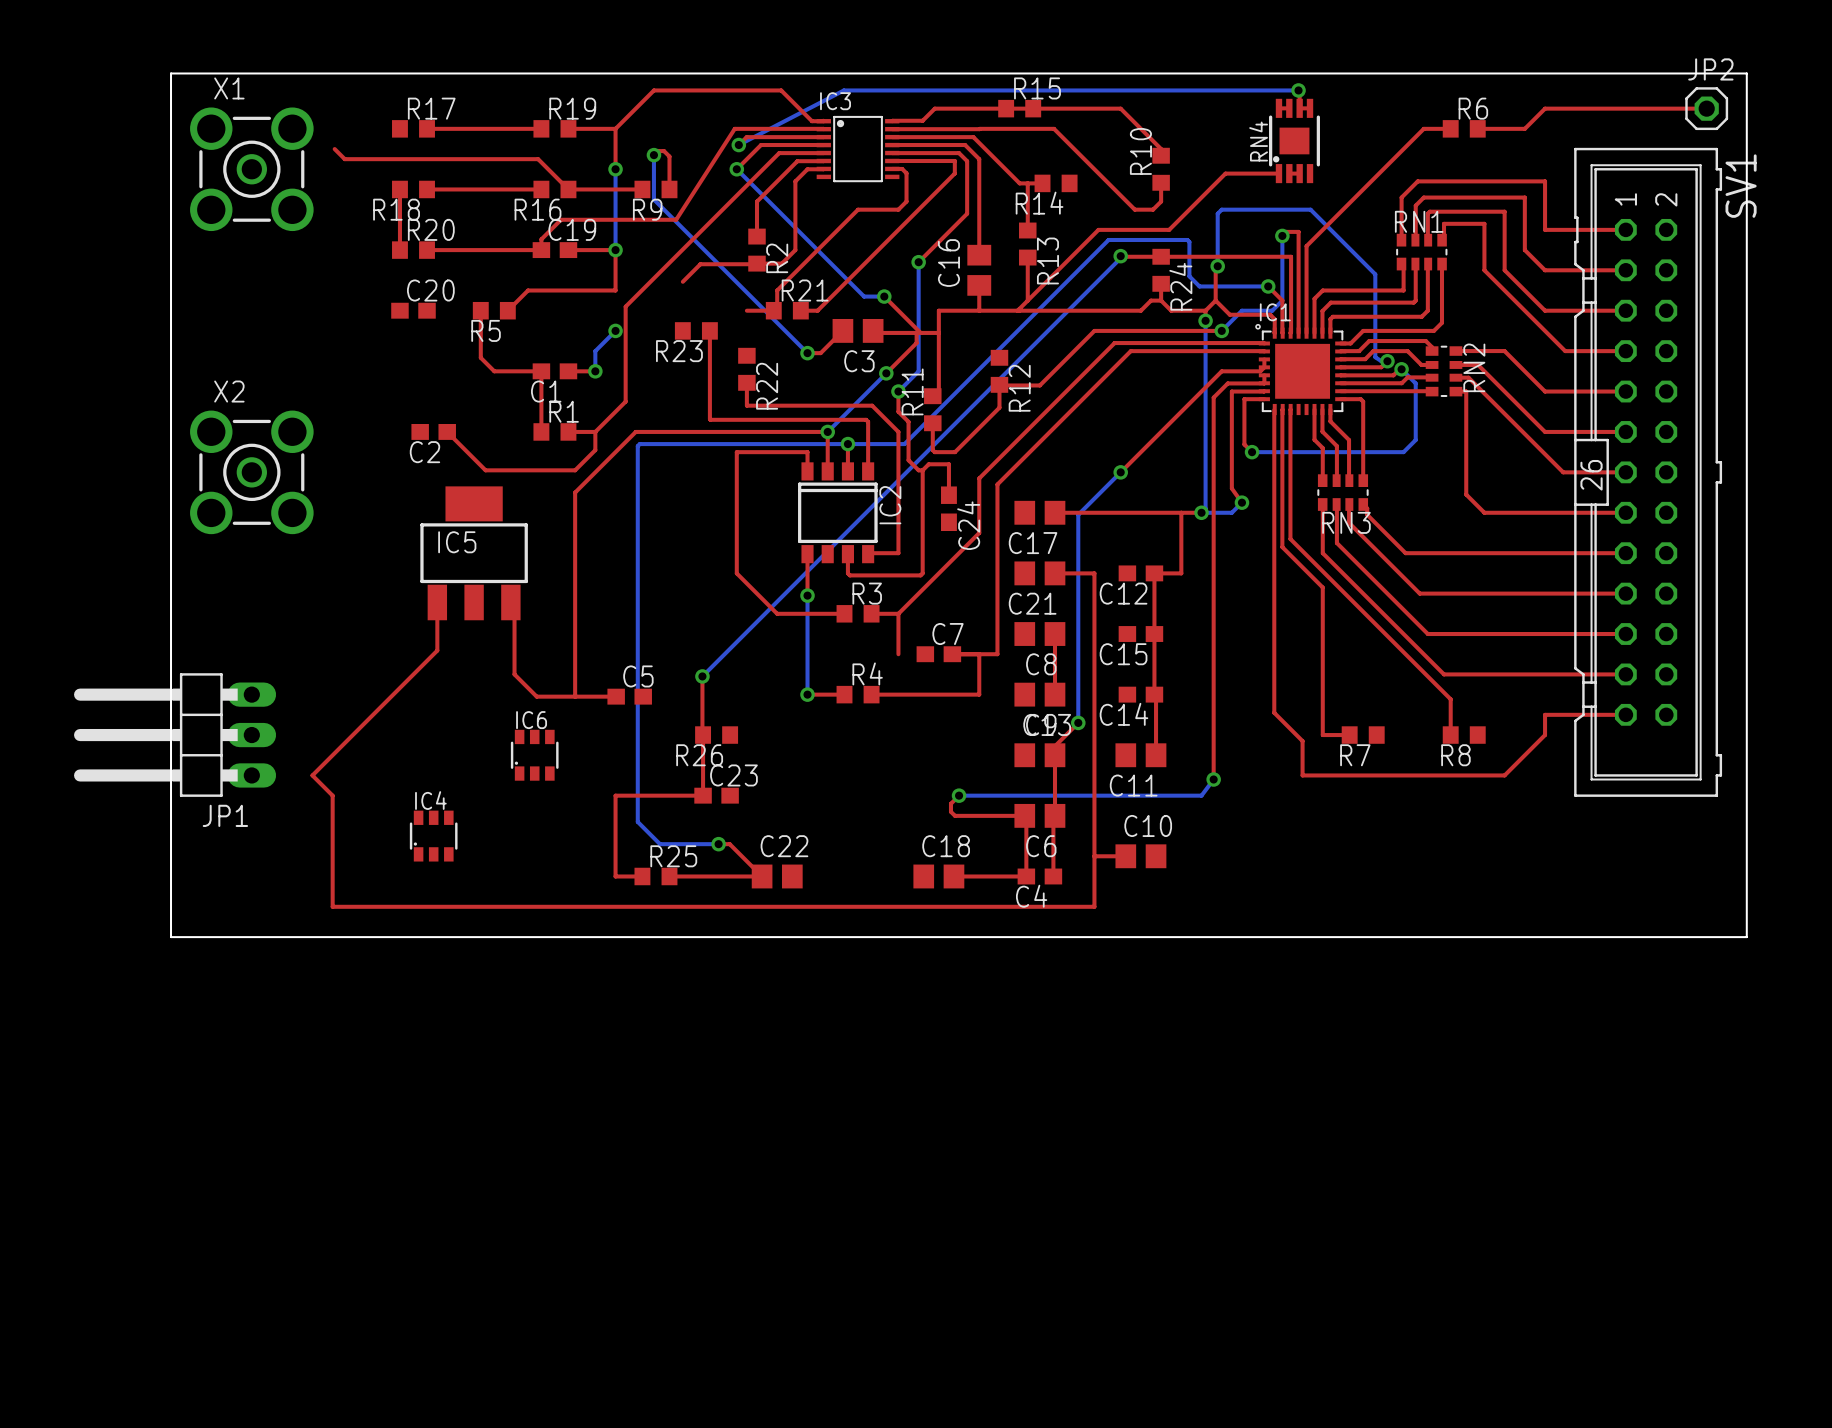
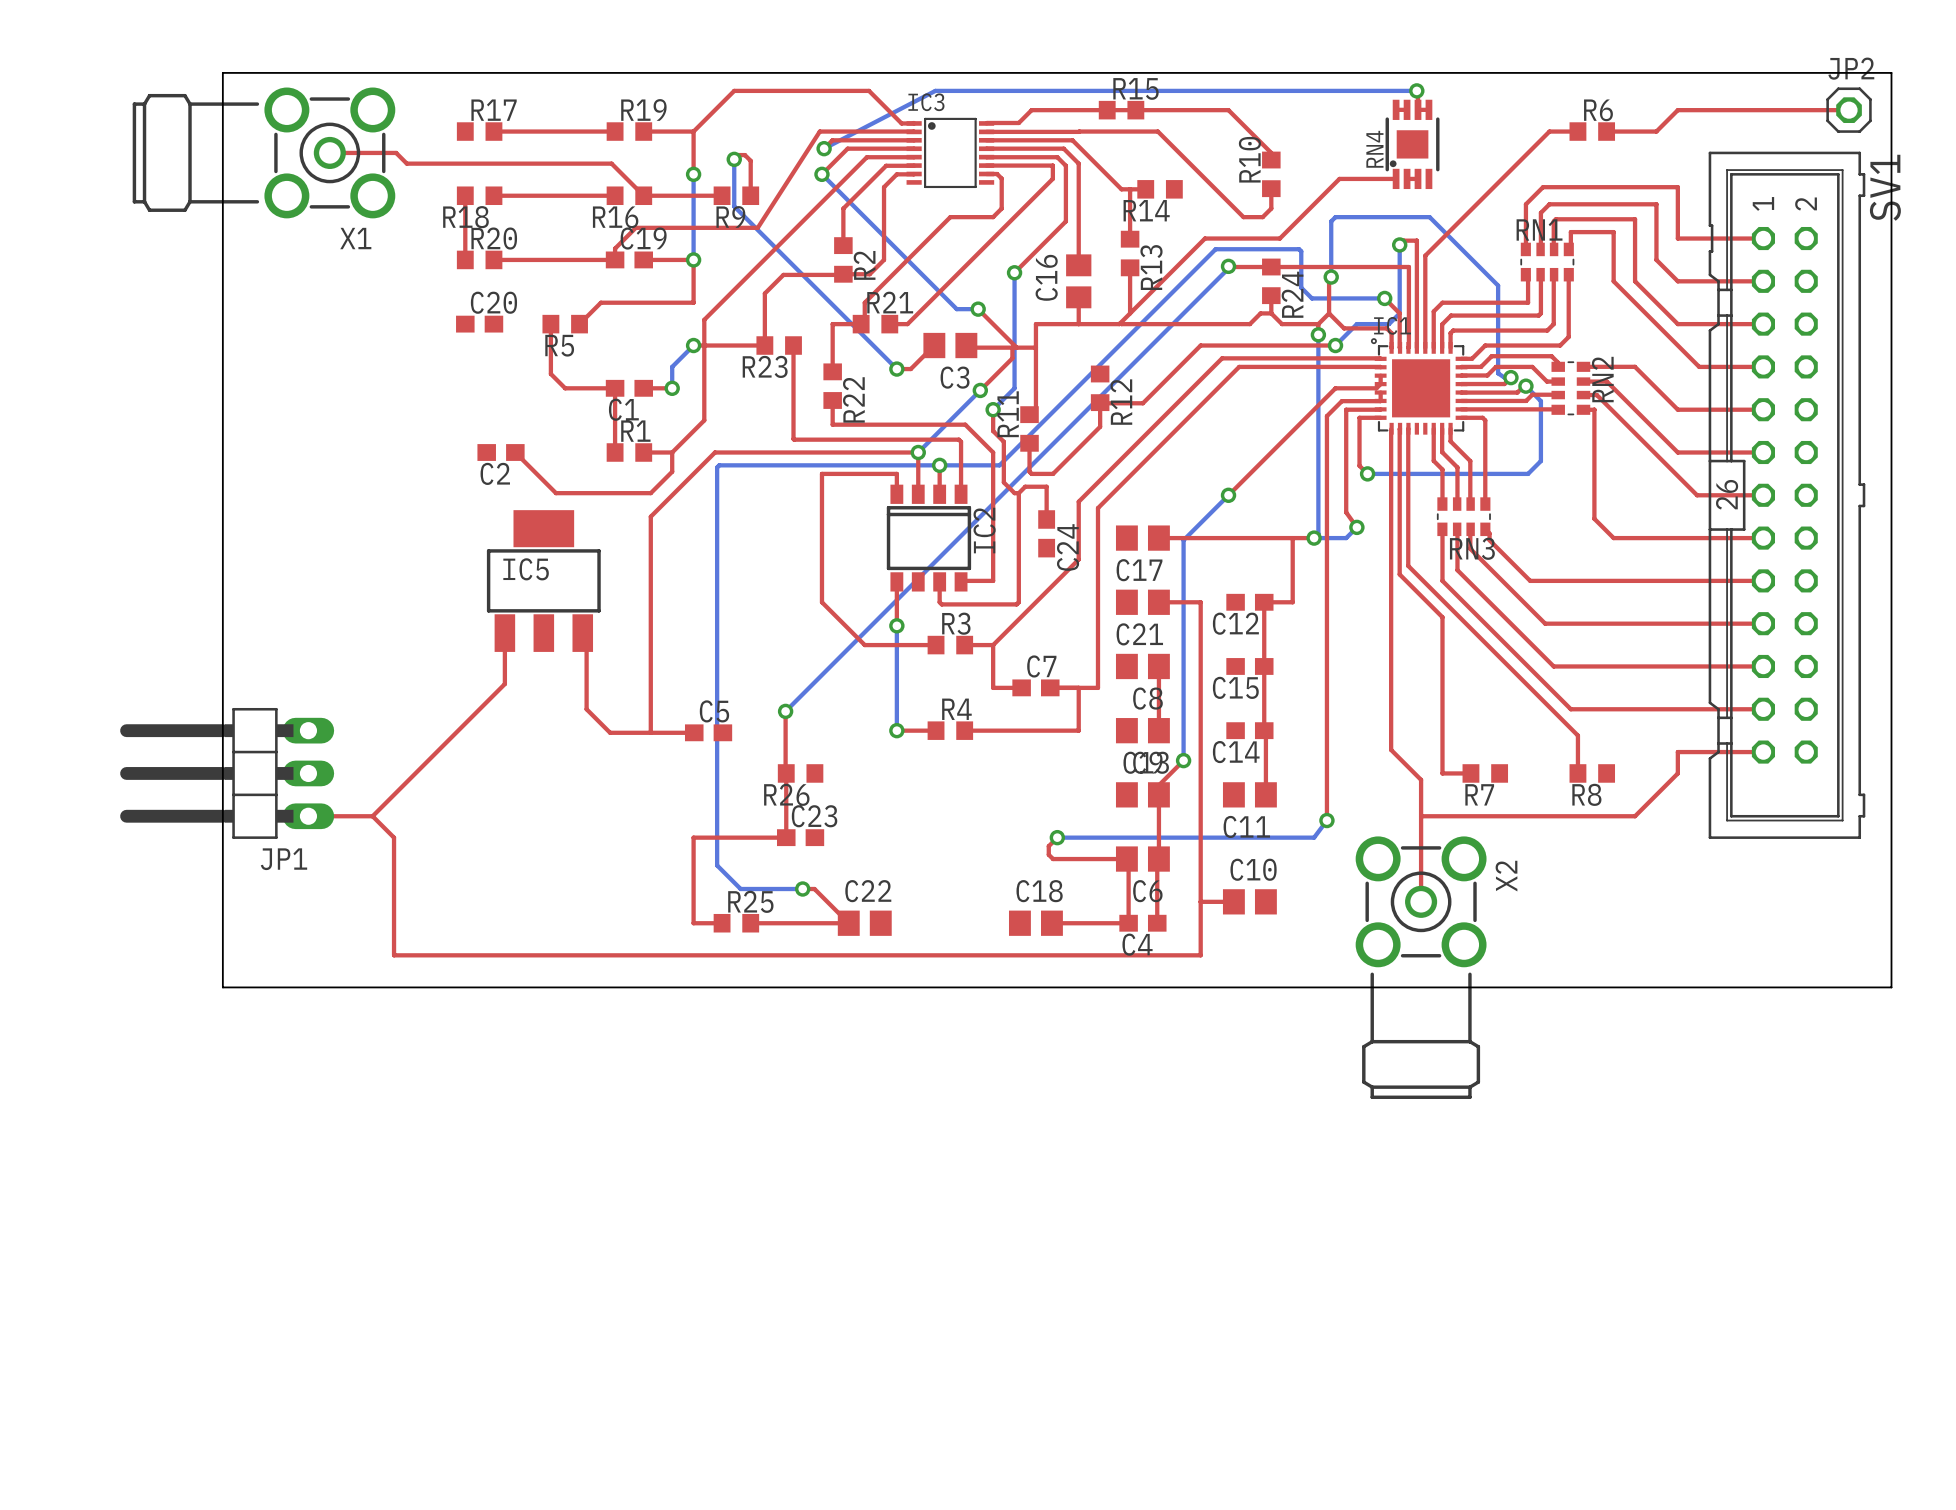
X1 name position: X1 (229, 88) -> X1 (355, 238)
X1 footprint: [190, 107, 314, 232] -> [132, 87, 396, 219]
top track: none -> (329, 152) (396, 152)
top track: none -> (764, 293) (764, 345) (693, 345)
top track: none -> (832, 324) (832, 371) (837, 366)
X2 name position: X2 (229, 391) -> X2 (1506, 876)
X2 footprint: [190, 410, 314, 535] -> [1355, 836, 1487, 1099]
top track: none -> (993, 687) (1021, 687)
IC6: (534, 755) -> none
top track: none -> (308, 816) (372, 816)
top track: none -> (1421, 816) (1421, 901)
IC4: (433, 836) -> none

